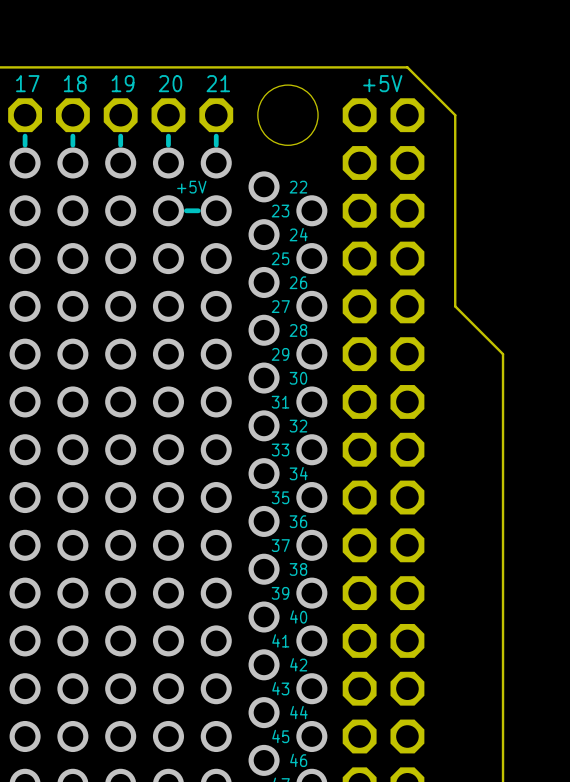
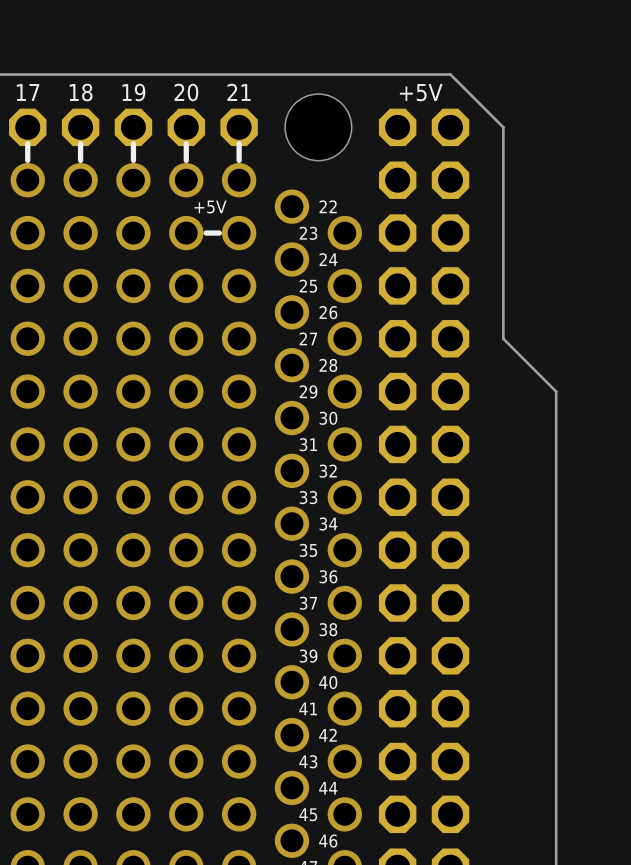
line: none -> (27, 143) (27, 150)
line: none -> (80, 143) (80, 150)
line: none -> (133, 143) (133, 150)
line: none -> (186, 143) (186, 150)
line: none -> (239, 143) (239, 150)

